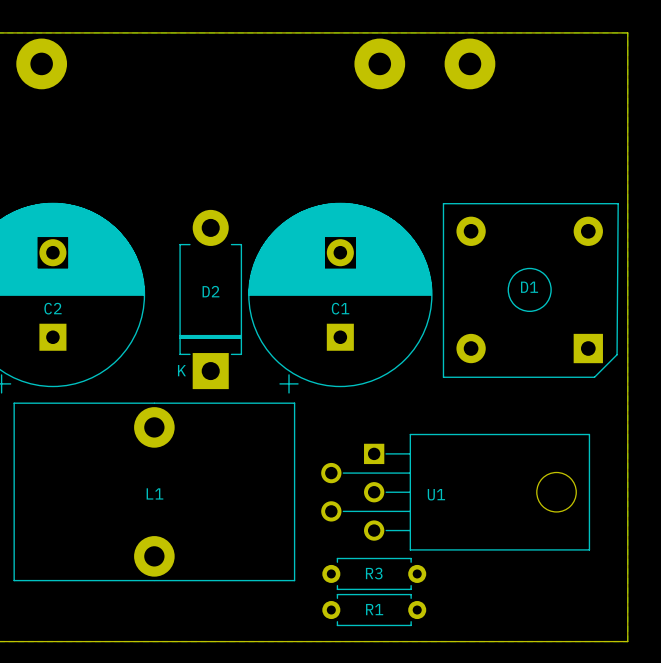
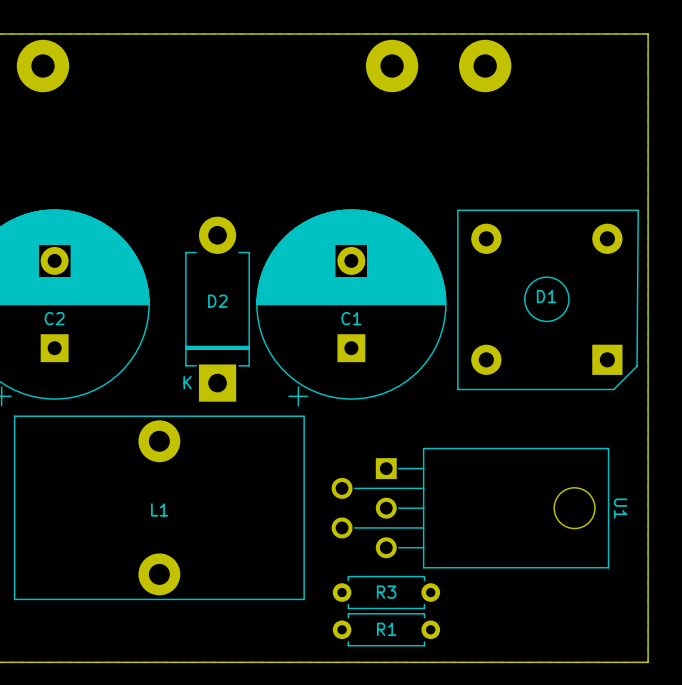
U1 name rotation: 0° (436, 494) -> 90° clockwise (620, 508)
U1 name position: U1 (436, 494) -> U1 (620, 508)

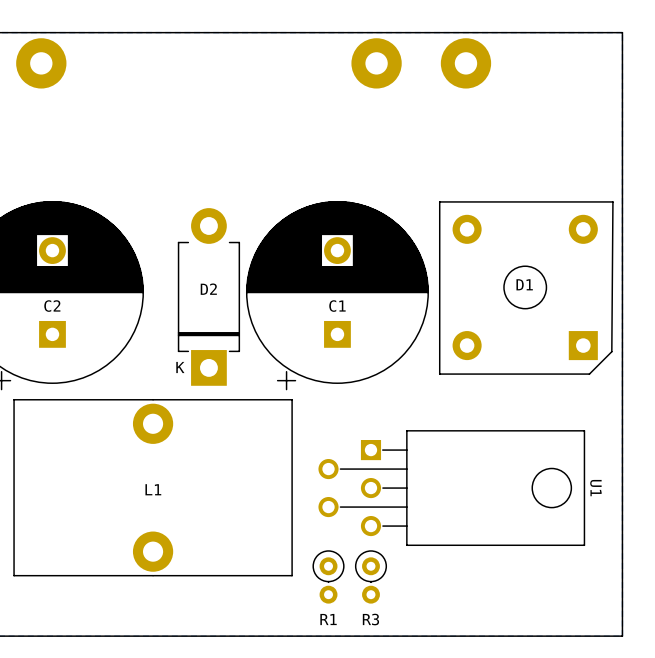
R3 footprint: [332, 575, 441, 610] -> [355, 550, 387, 604]
R3 name position: R3 (386, 592) -> R3 (370, 619)
R1 footprint: [332, 613, 441, 647] -> [312, 550, 345, 604]
R1 name position: R1 (386, 629) -> R1 (328, 619)

